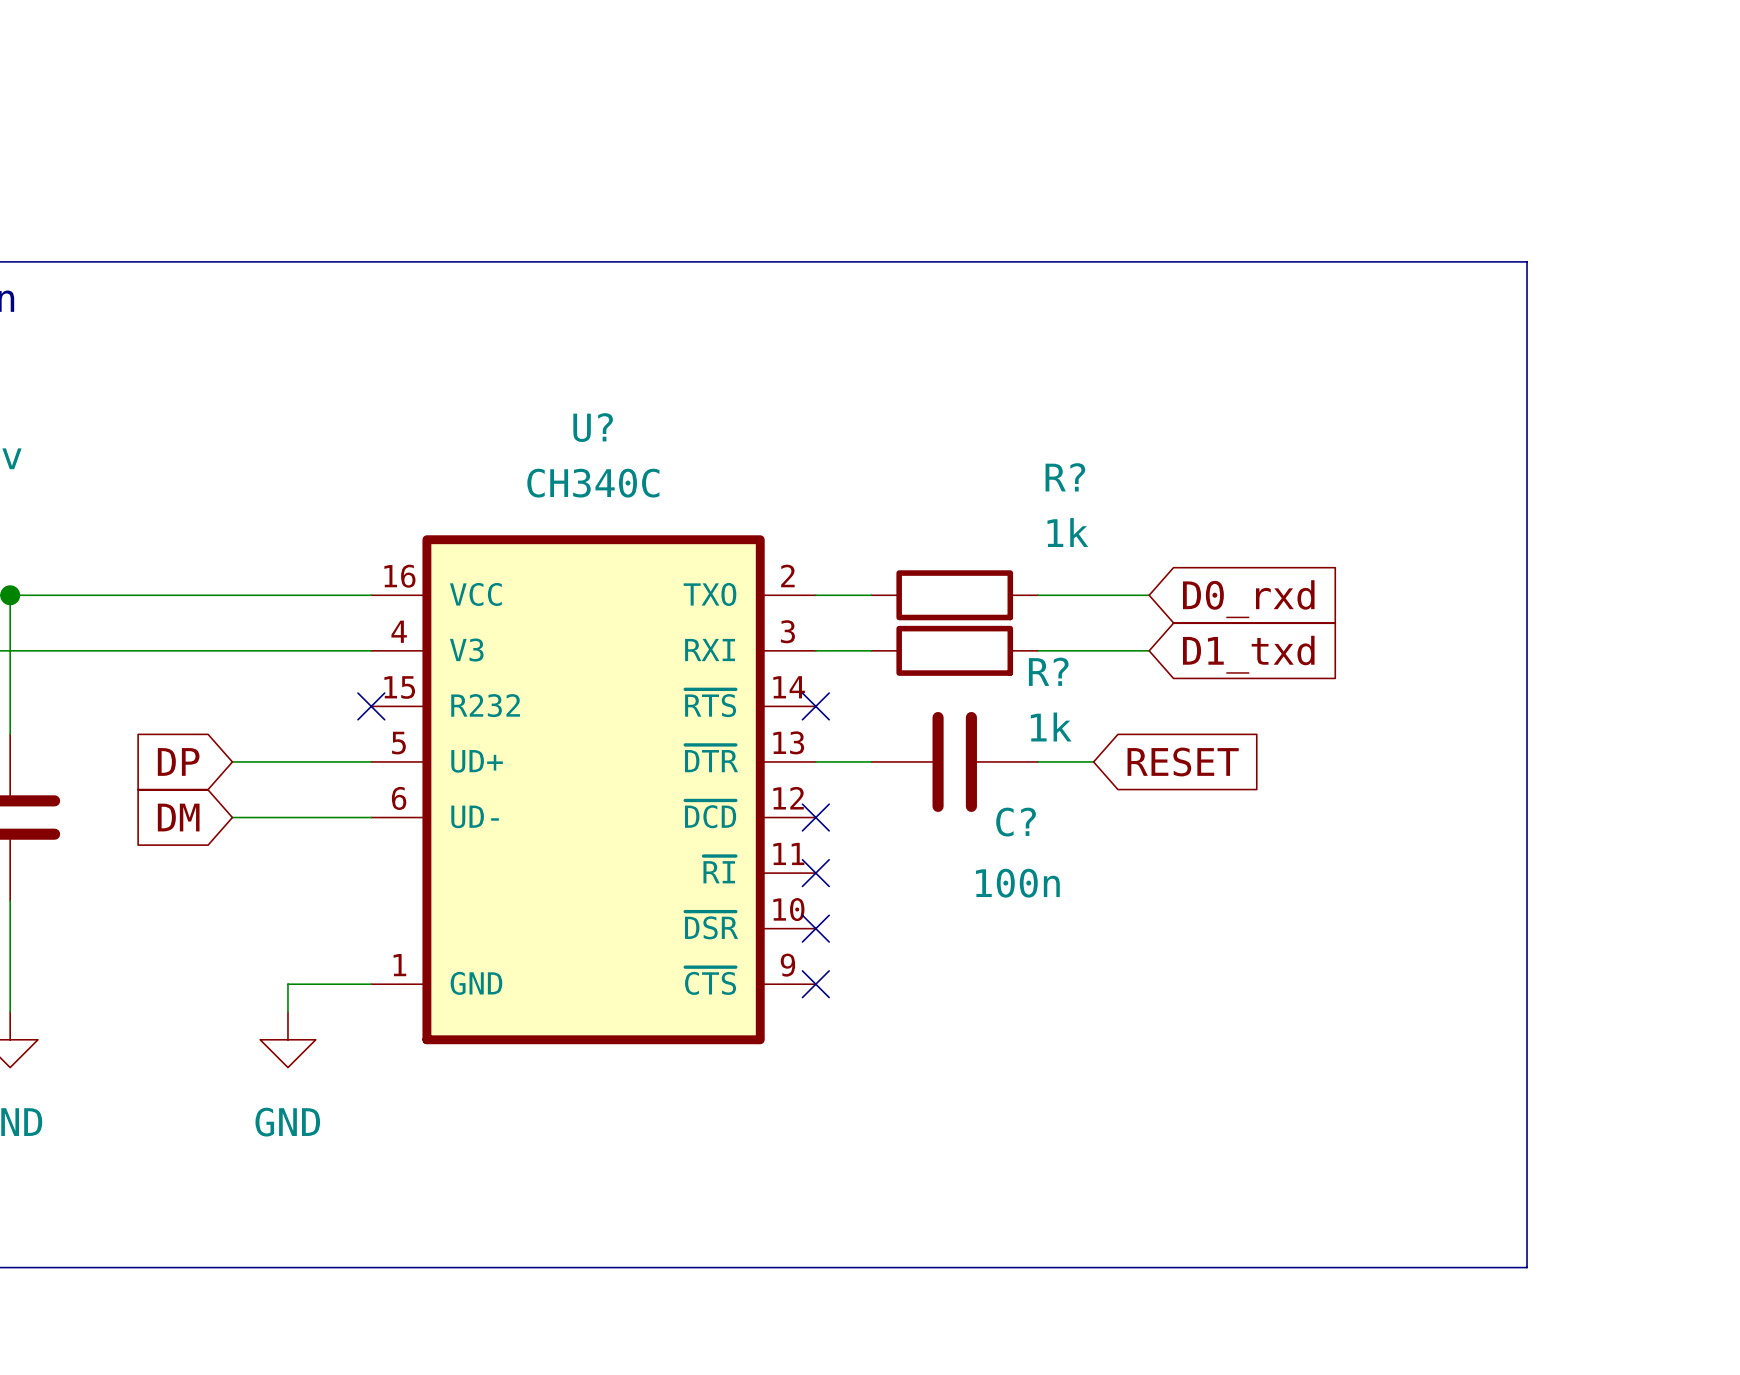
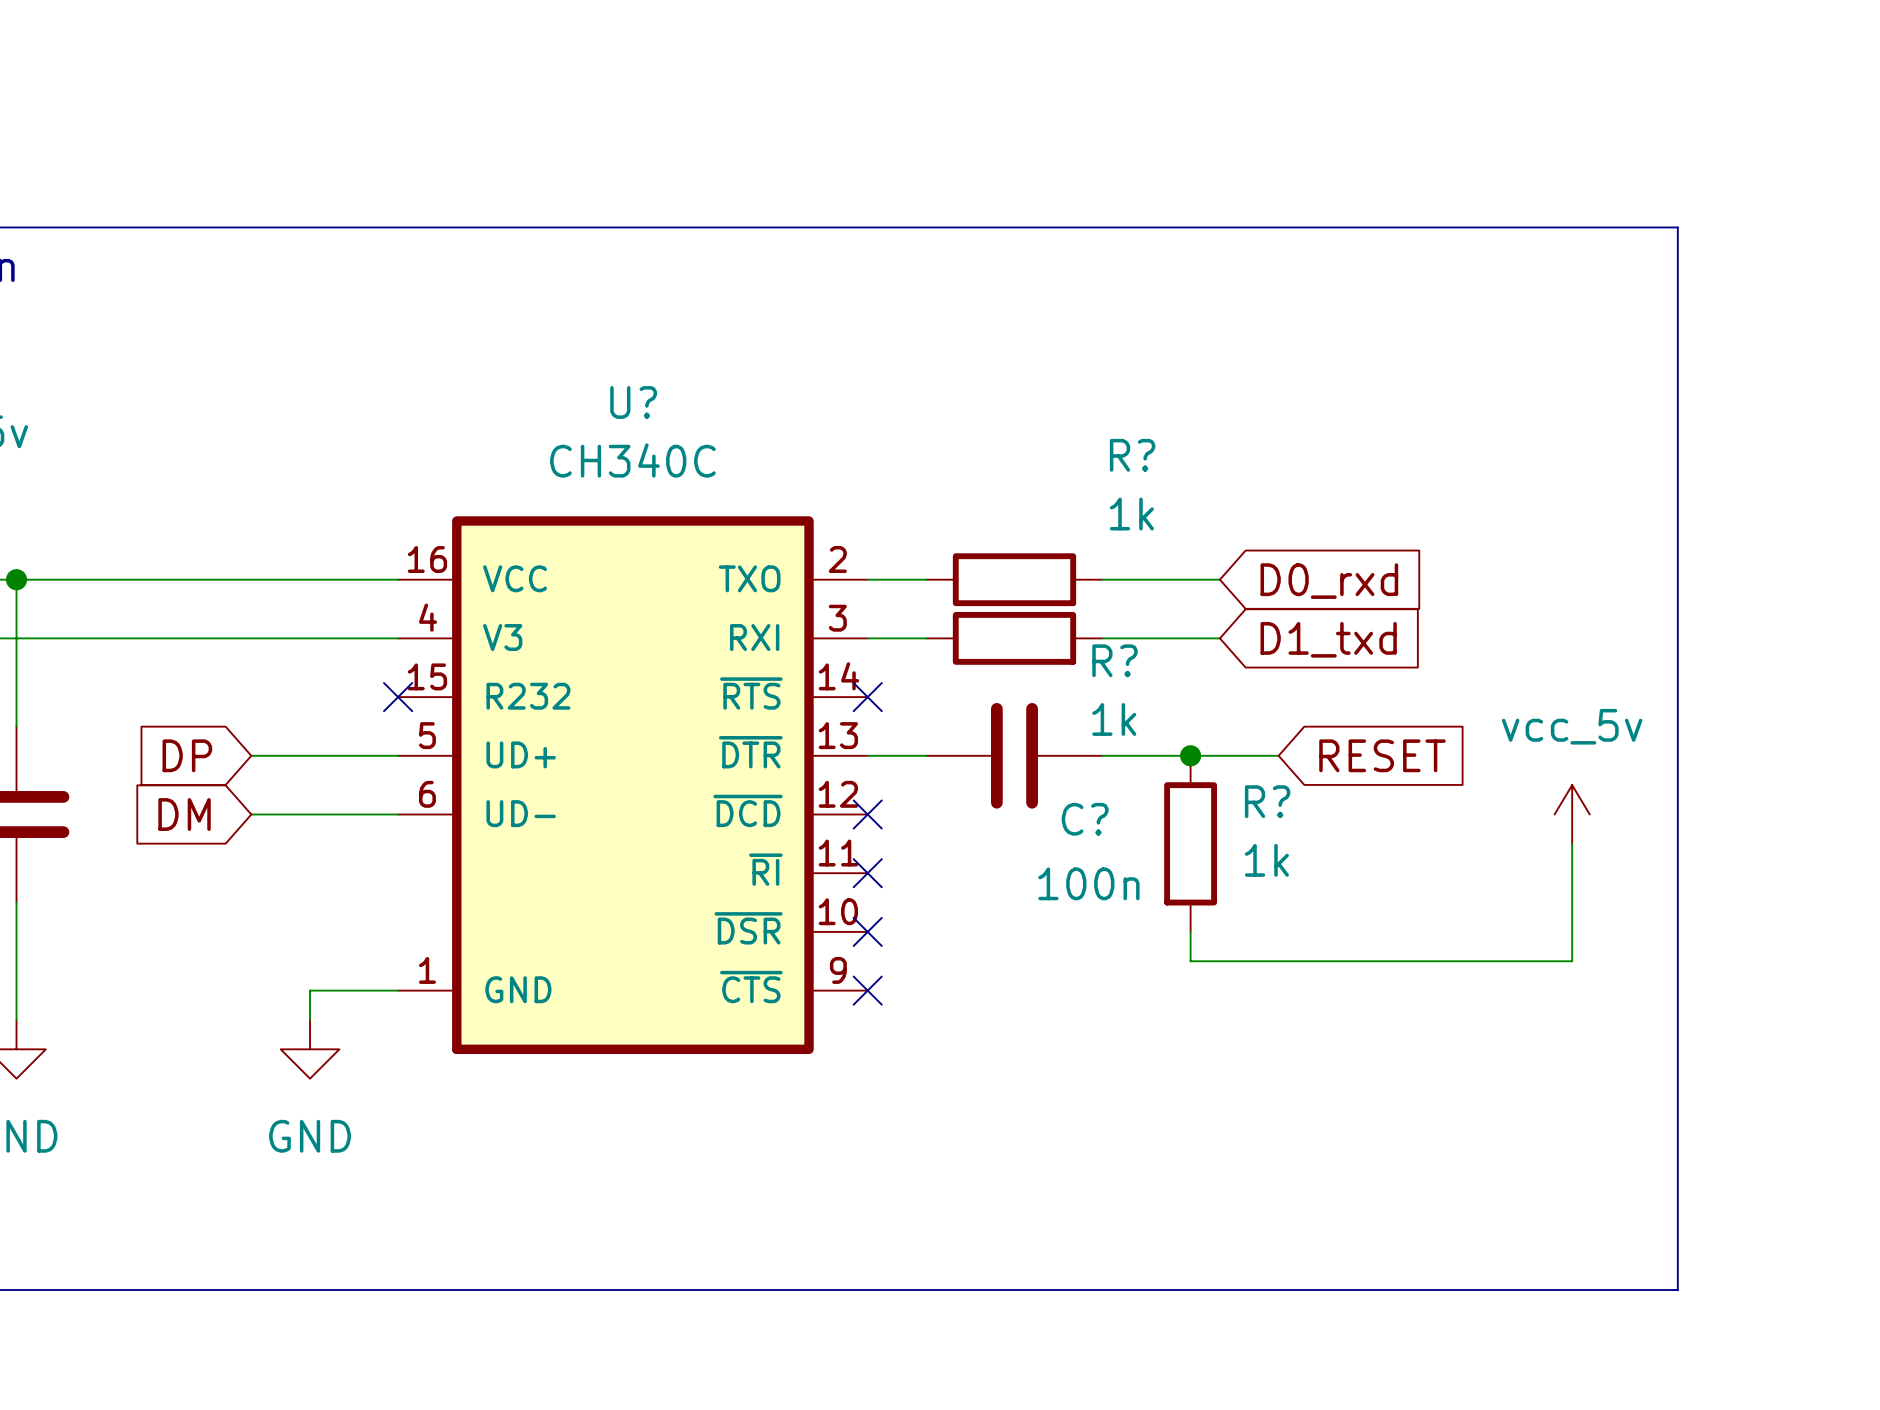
line: (1527, 261) (1527, 1267) -> (1619, 227) (1677, 227) (1677, 1290) (1619, 1290)
wire: none -> (1161, 755) (1278, 755)
junction: none -> (1190, 755)
global label position: RESET (1183, 761) -> RESET (1382, 755)
power symbol: none -> vcc_5v (1572, 814)
R?: none -> 1k (1190, 843)
wire: none -> (1572, 843) (1572, 961) (1190, 961) (1190, 931)

